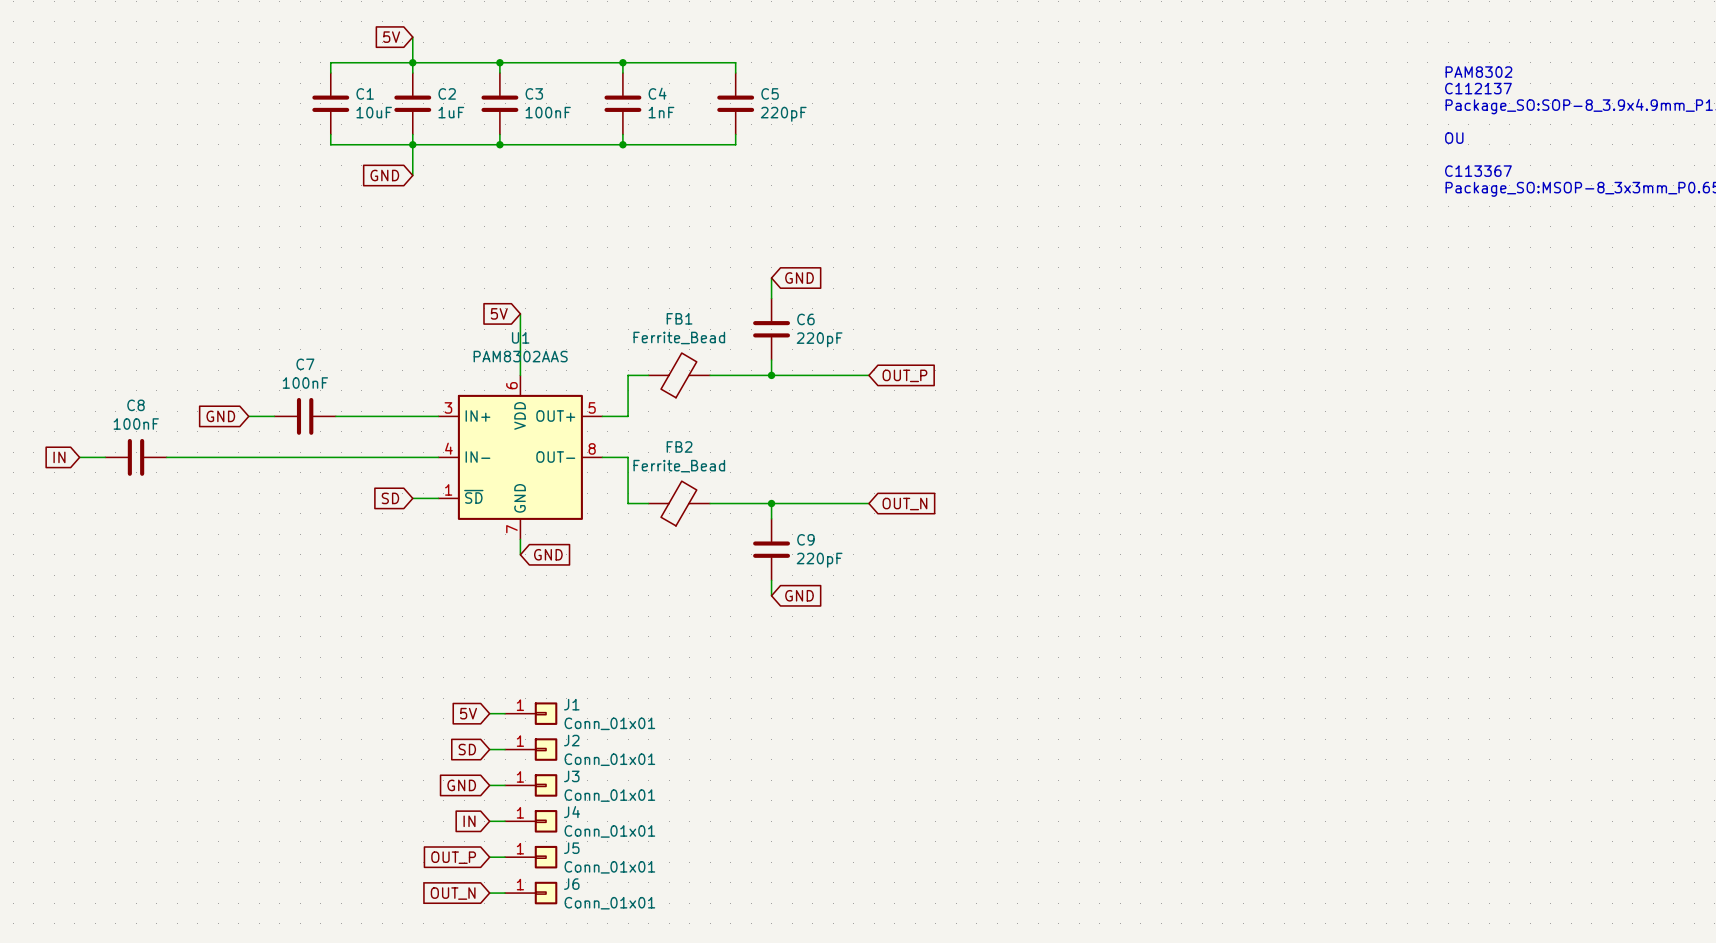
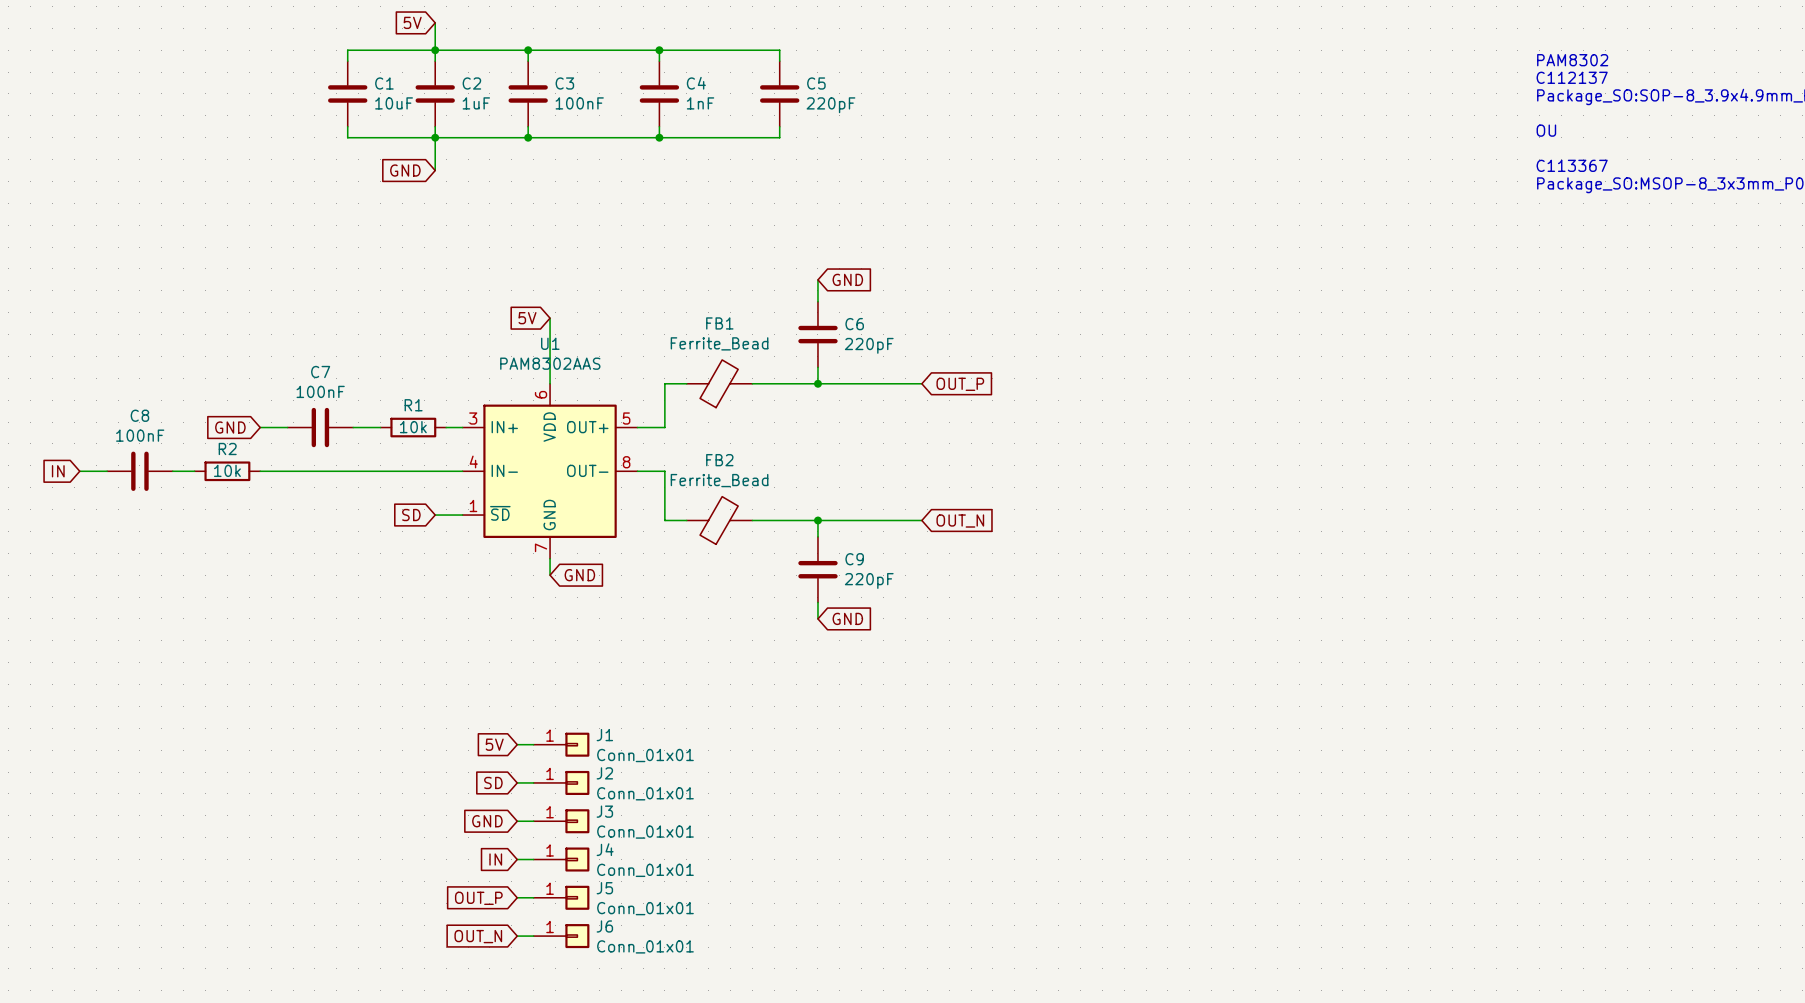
wire: (361, 416) (423, 416) -> none
R1: none -> 10k (413, 427)
wire: (187, 457) (248, 457) -> none
R2: none -> 10k (227, 471)

